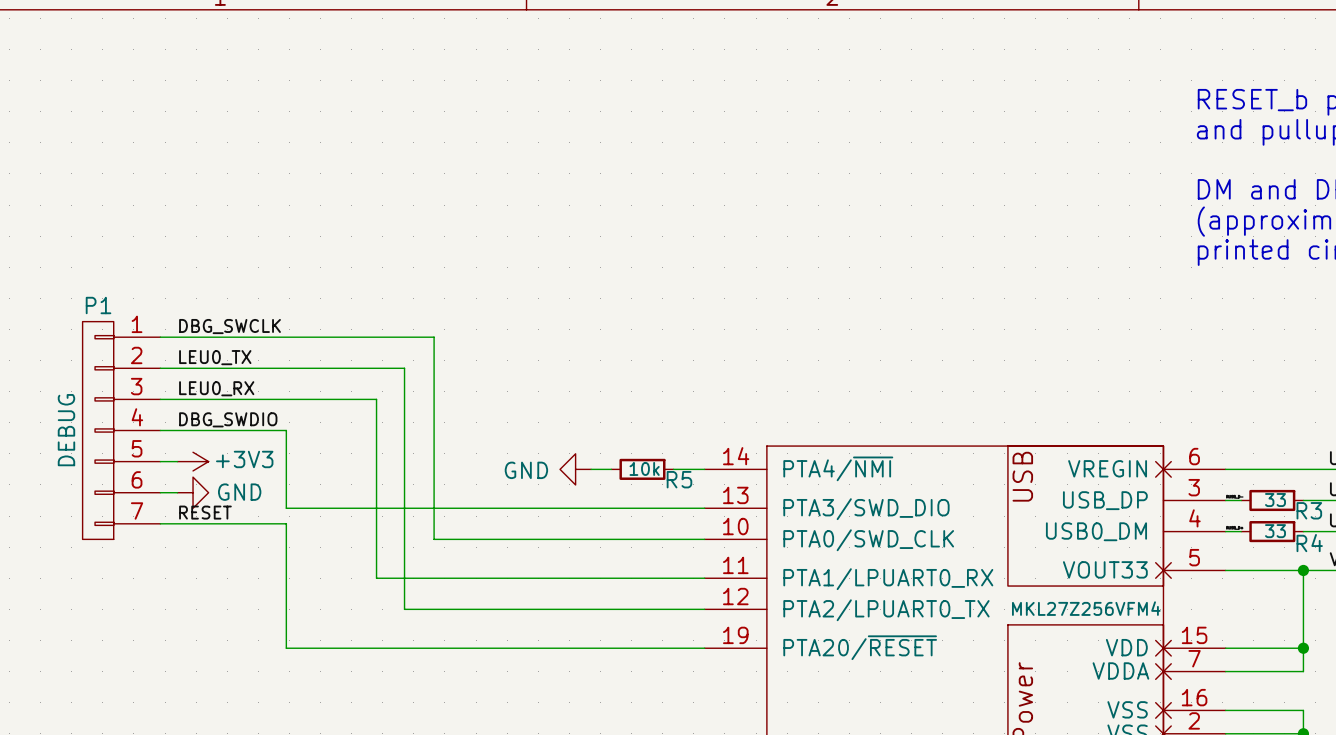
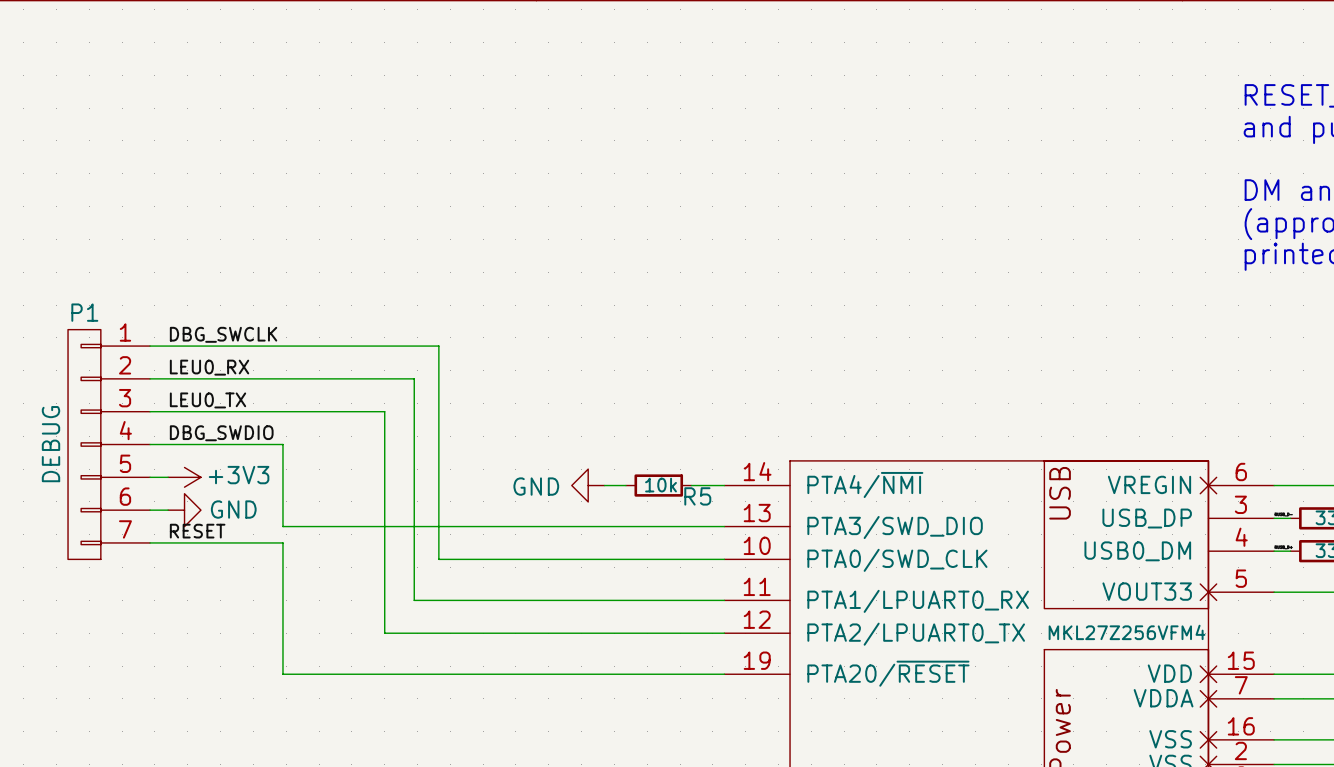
label: LEU0_TX (215, 357) -> LEU0_RX (209, 367)
wire: (404, 368) (404, 609) -> (407, 378) (414, 378) (414, 600)
label: LEU0_RX (216, 388) -> LEU0_TX (208, 400)
wire: (376, 399) (376, 578) (410, 578) -> (378, 411) (384, 411) (384, 633) (407, 633)

